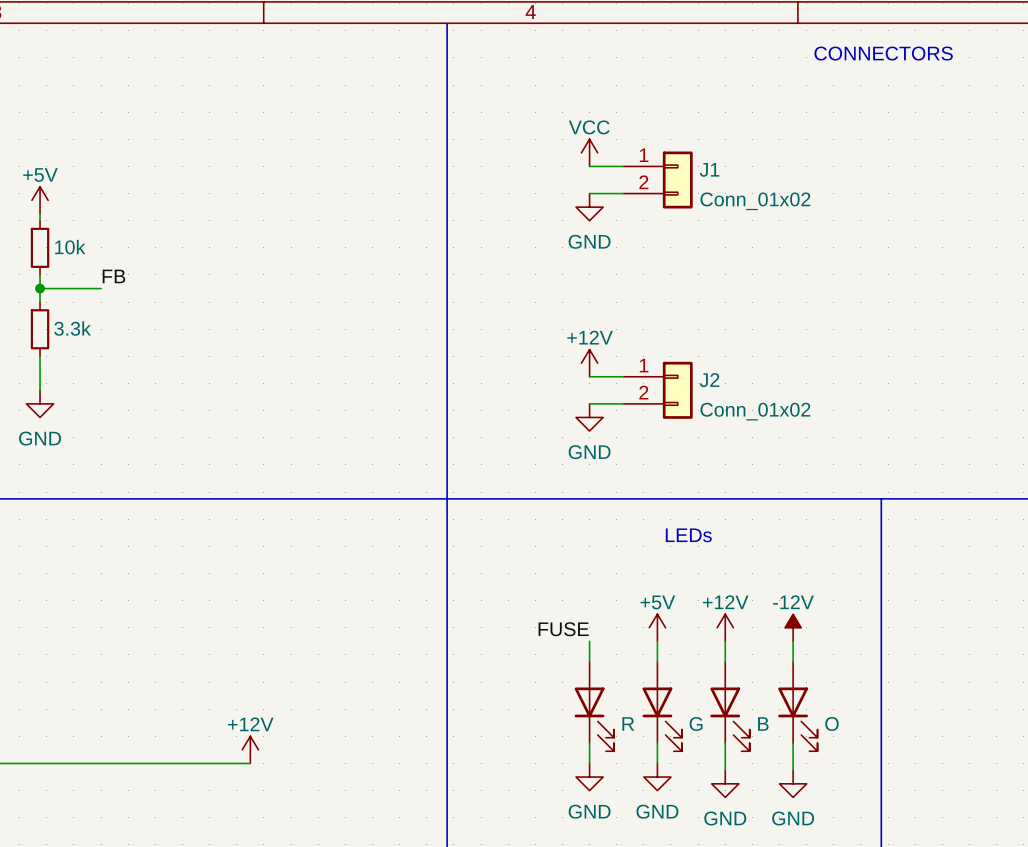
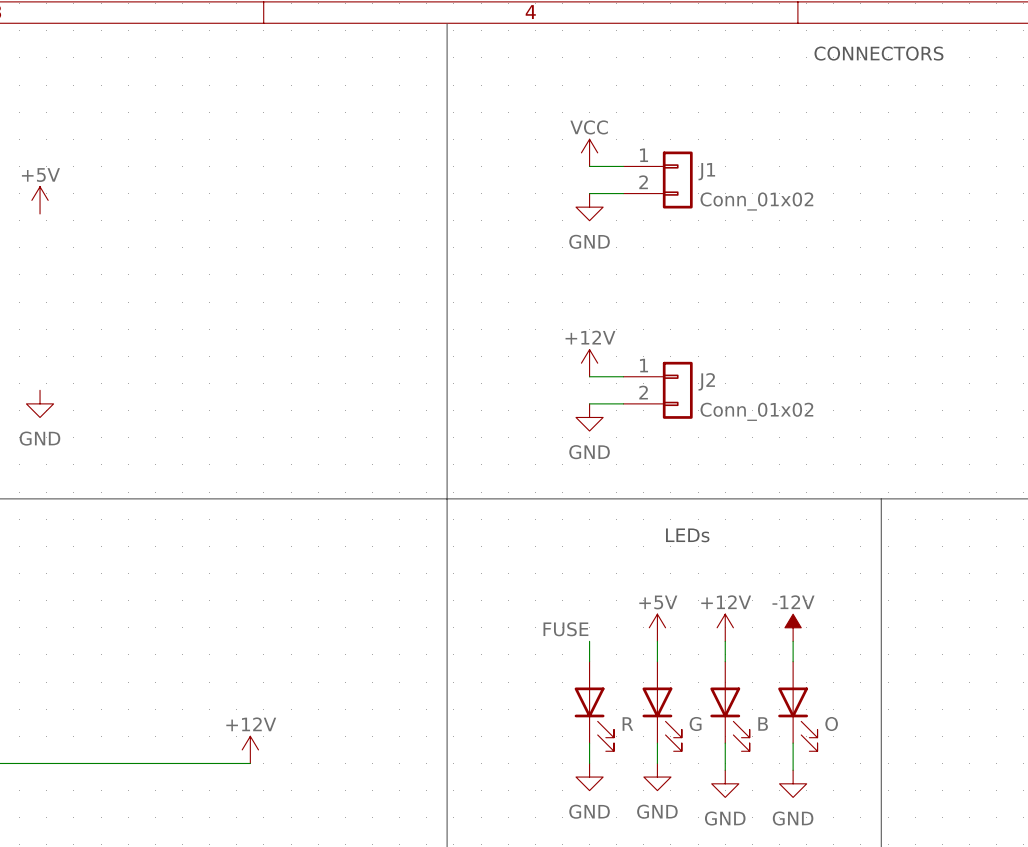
wire: (40, 213) (40, 220) -> none
part: 10k (40, 247) -> none
wire: (40, 274) (40, 302) -> none
label: FB (113, 276) -> none
wire: (40, 288) (101, 288) -> none
junction: (40, 288) -> none
part: 3.3k (40, 329) -> none
wire: (40, 356) (40, 390) -> none

